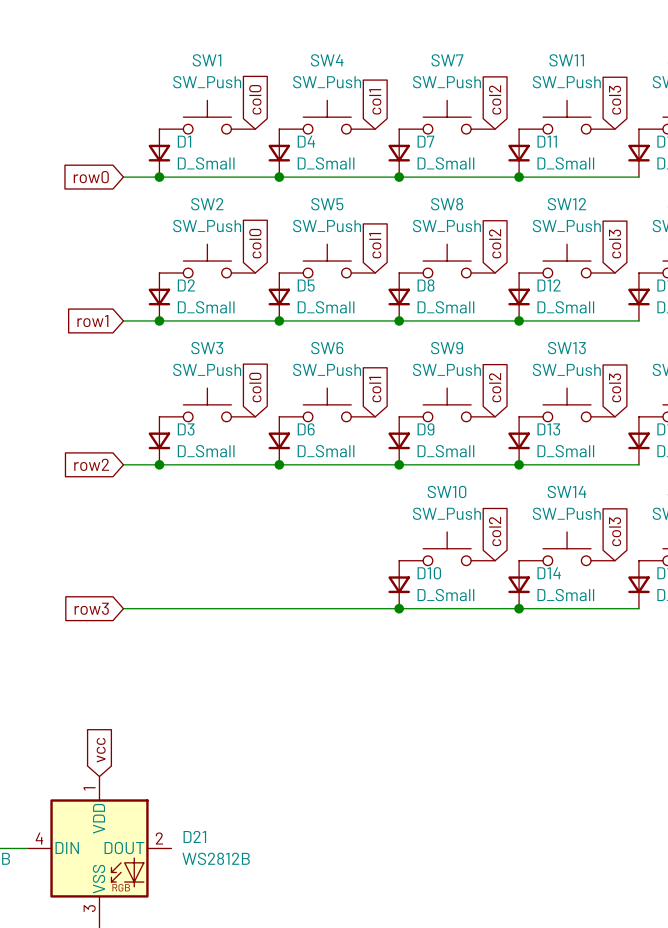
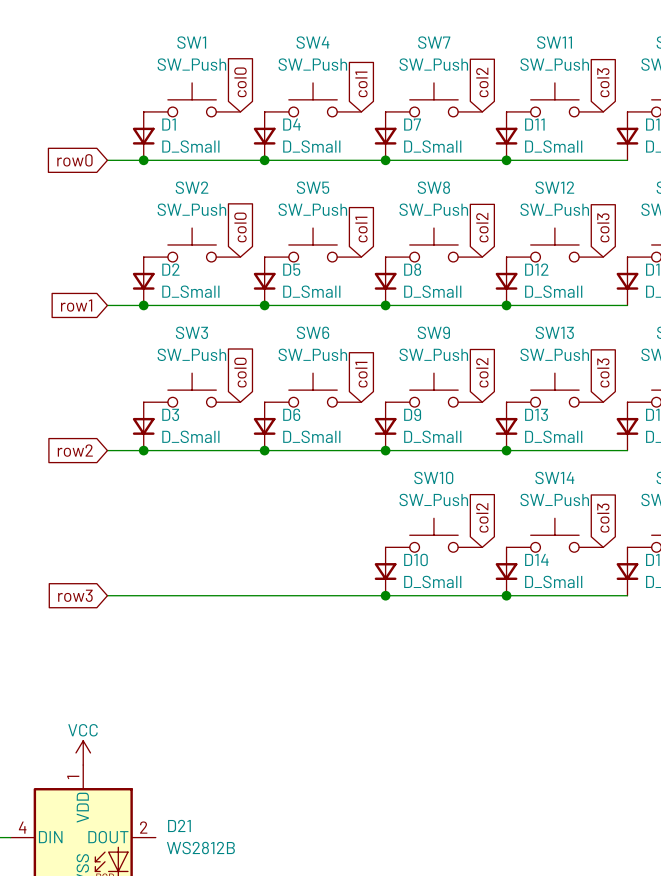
global label: vcc (101, 750) -> none
power symbol: none -> VCC (83, 752)

